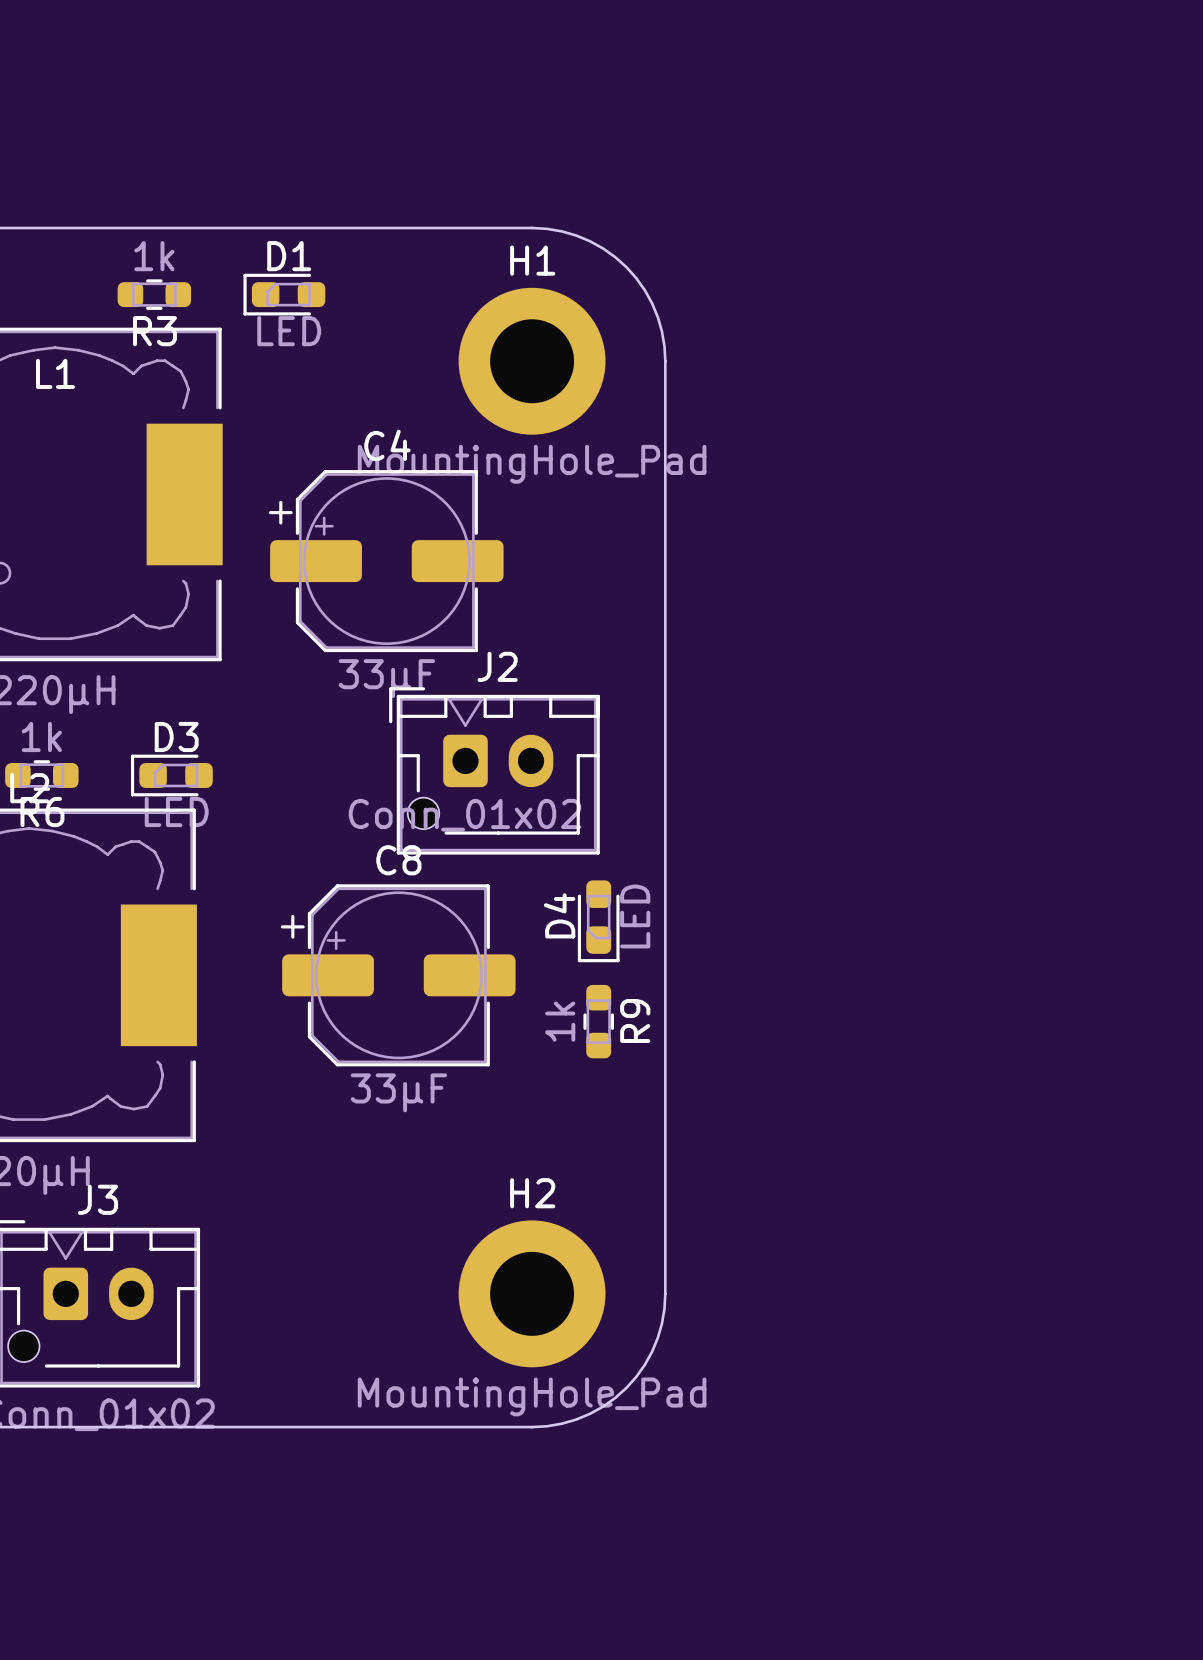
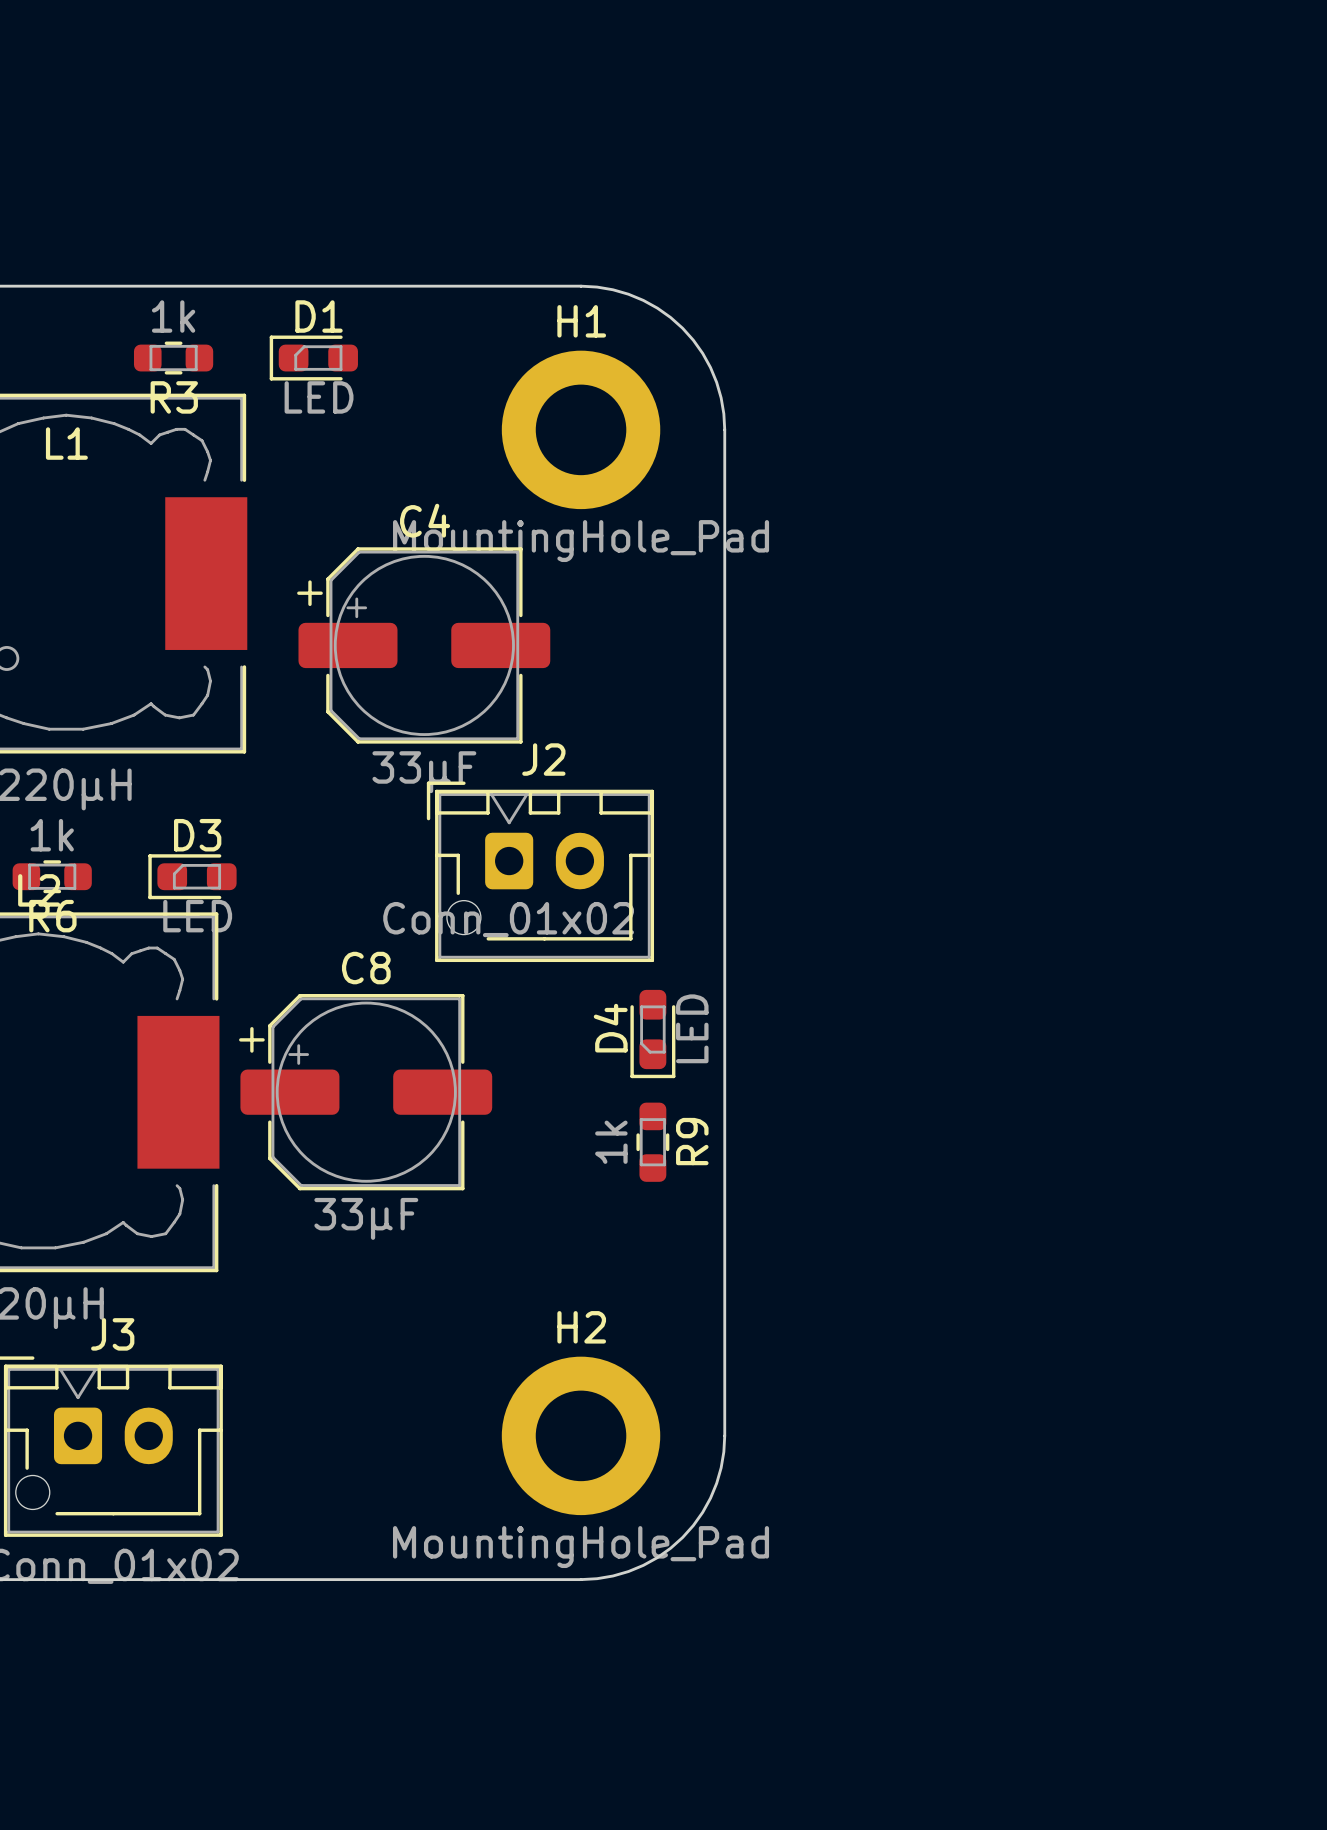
C8 footprint: [280, 884, 516, 1067] -> [239, 993, 493, 1191]

